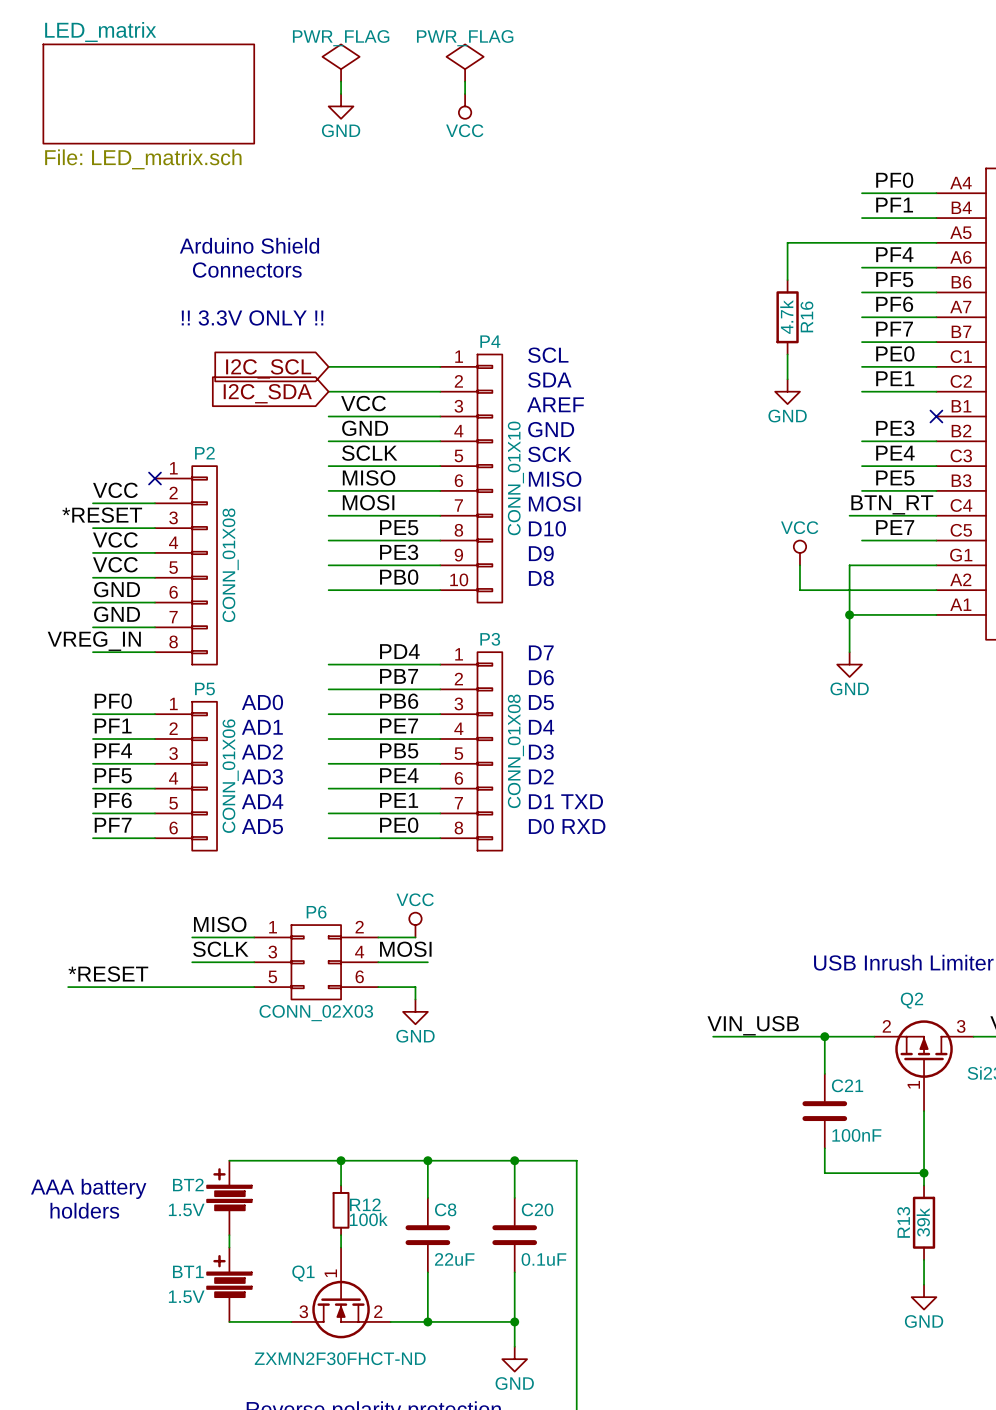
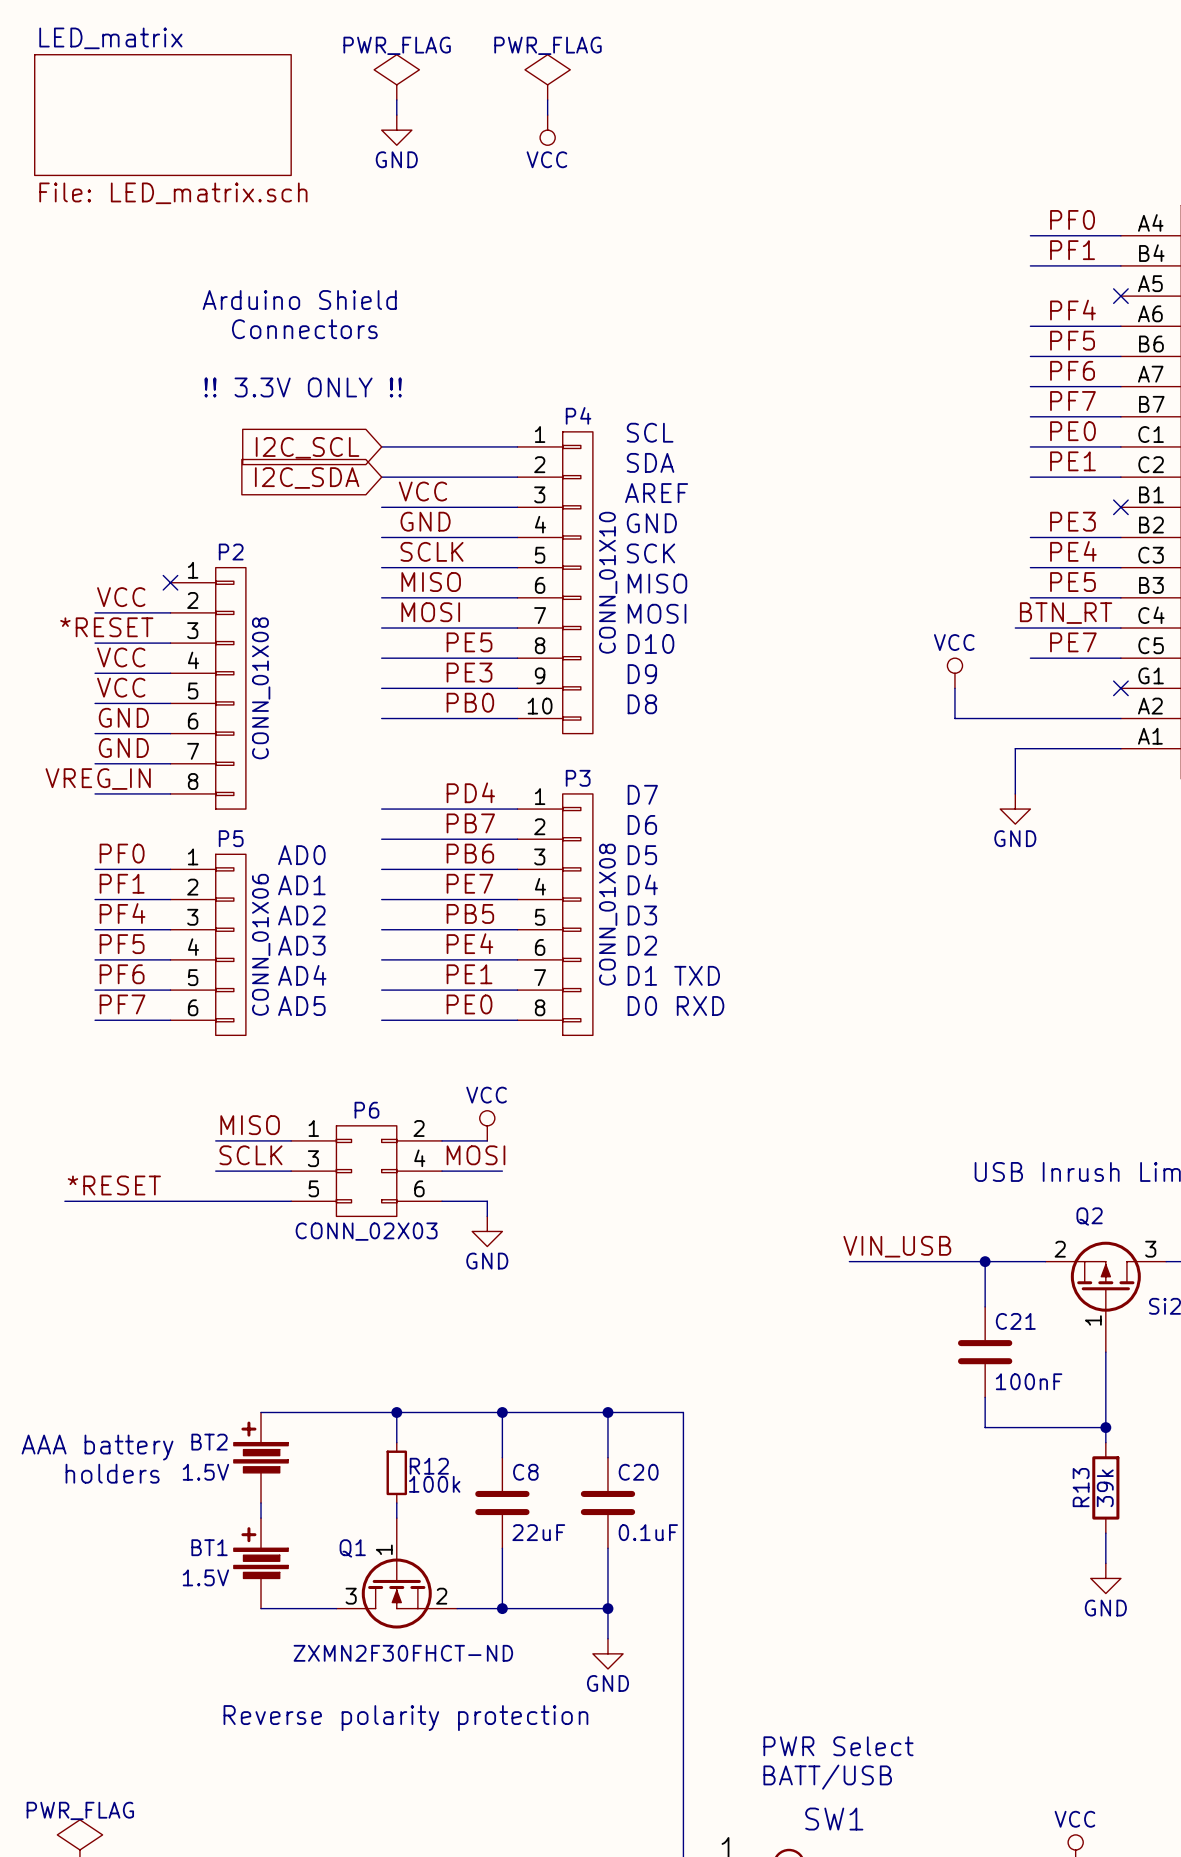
wire: (936, 242) (787, 242) (787, 280) -> none
no-connect mark: none -> (1120, 296)
R16: 4.7k (787, 317) -> none
wire: (787, 354) (787, 379) -> none
power symbol: GND (787, 391) -> none
wire: (936, 565) (849, 565) (849, 614) -> none
no-connect mark: none -> (1120, 688)
junction: (849, 614) -> none

